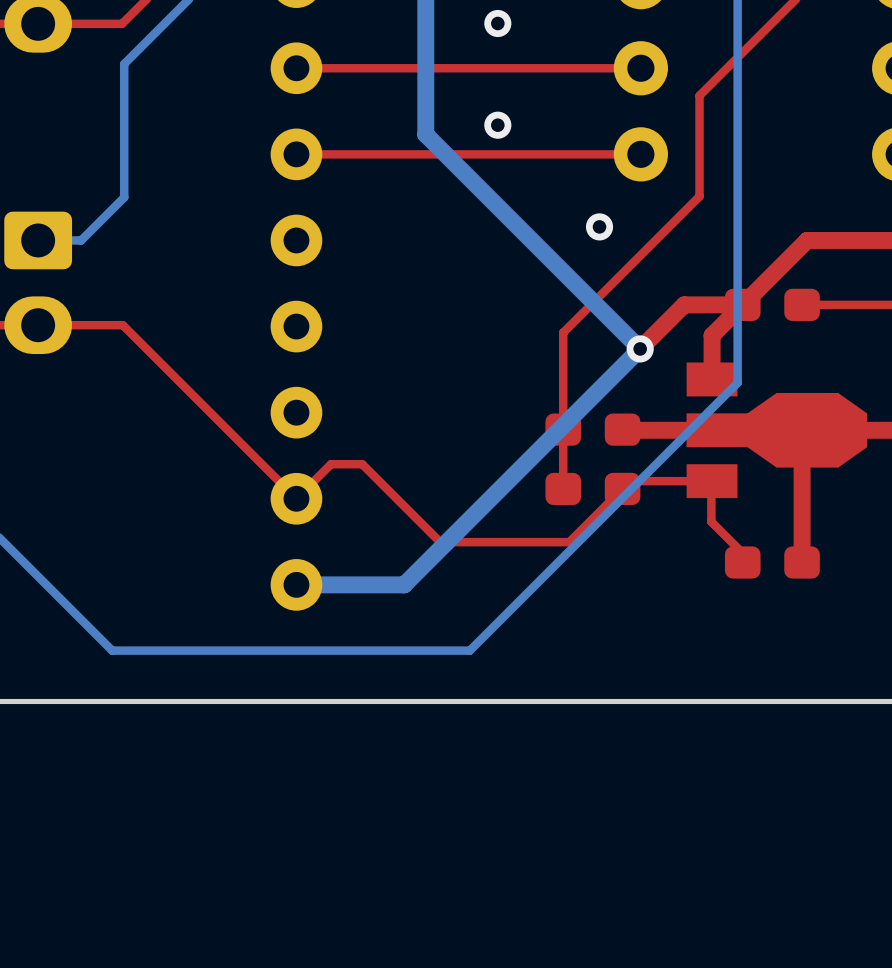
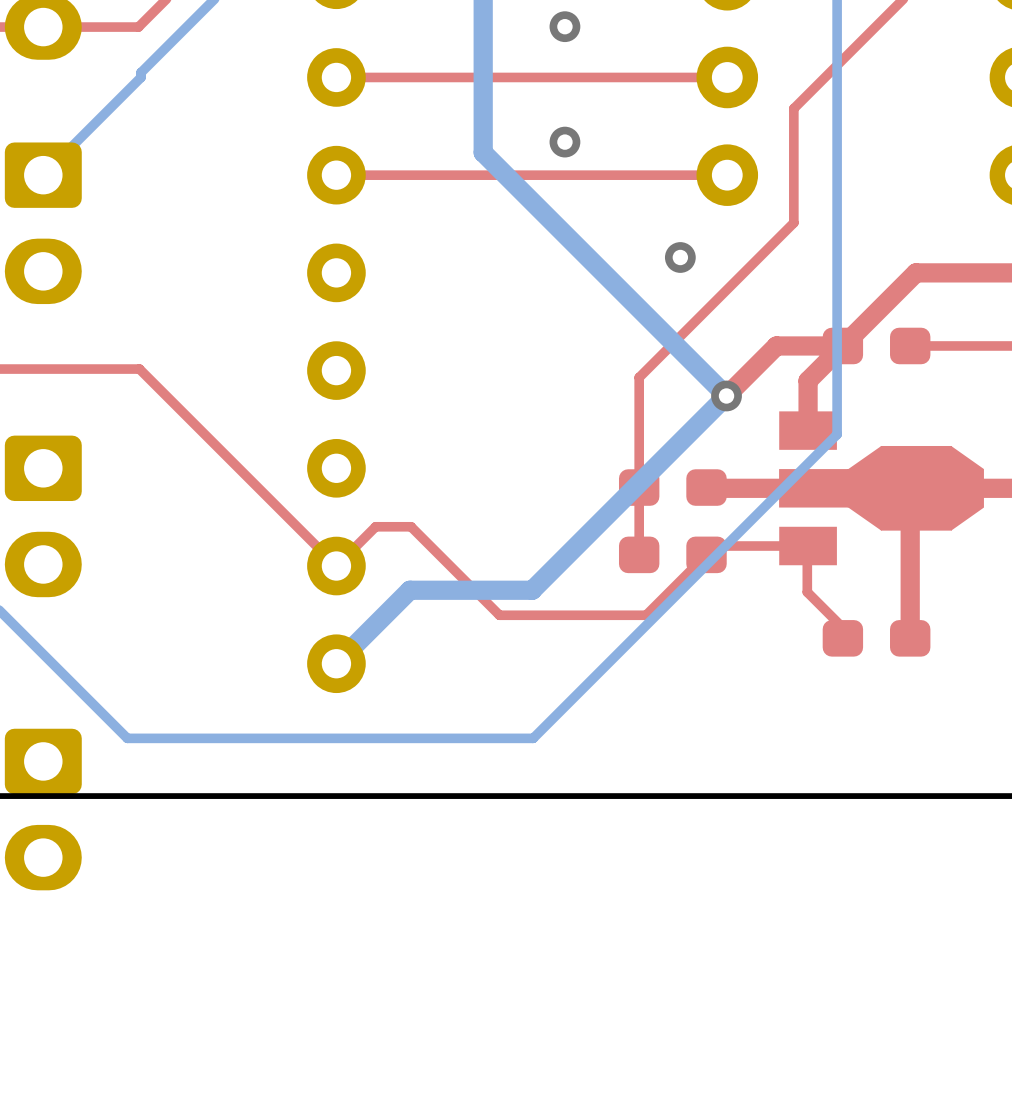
bottom track: (124, 68) (124, 197) (81, 240) (38, 240) -> (141, 77) (43, 175)
part: none -> (43, 223)
part: (38, 282) -> none
part: none -> (43, 516)
bottom track: (469, 520) (404, 584) (296, 584) -> (532, 590) (409, 590) (336, 663)
part: none -> (43, 809)

